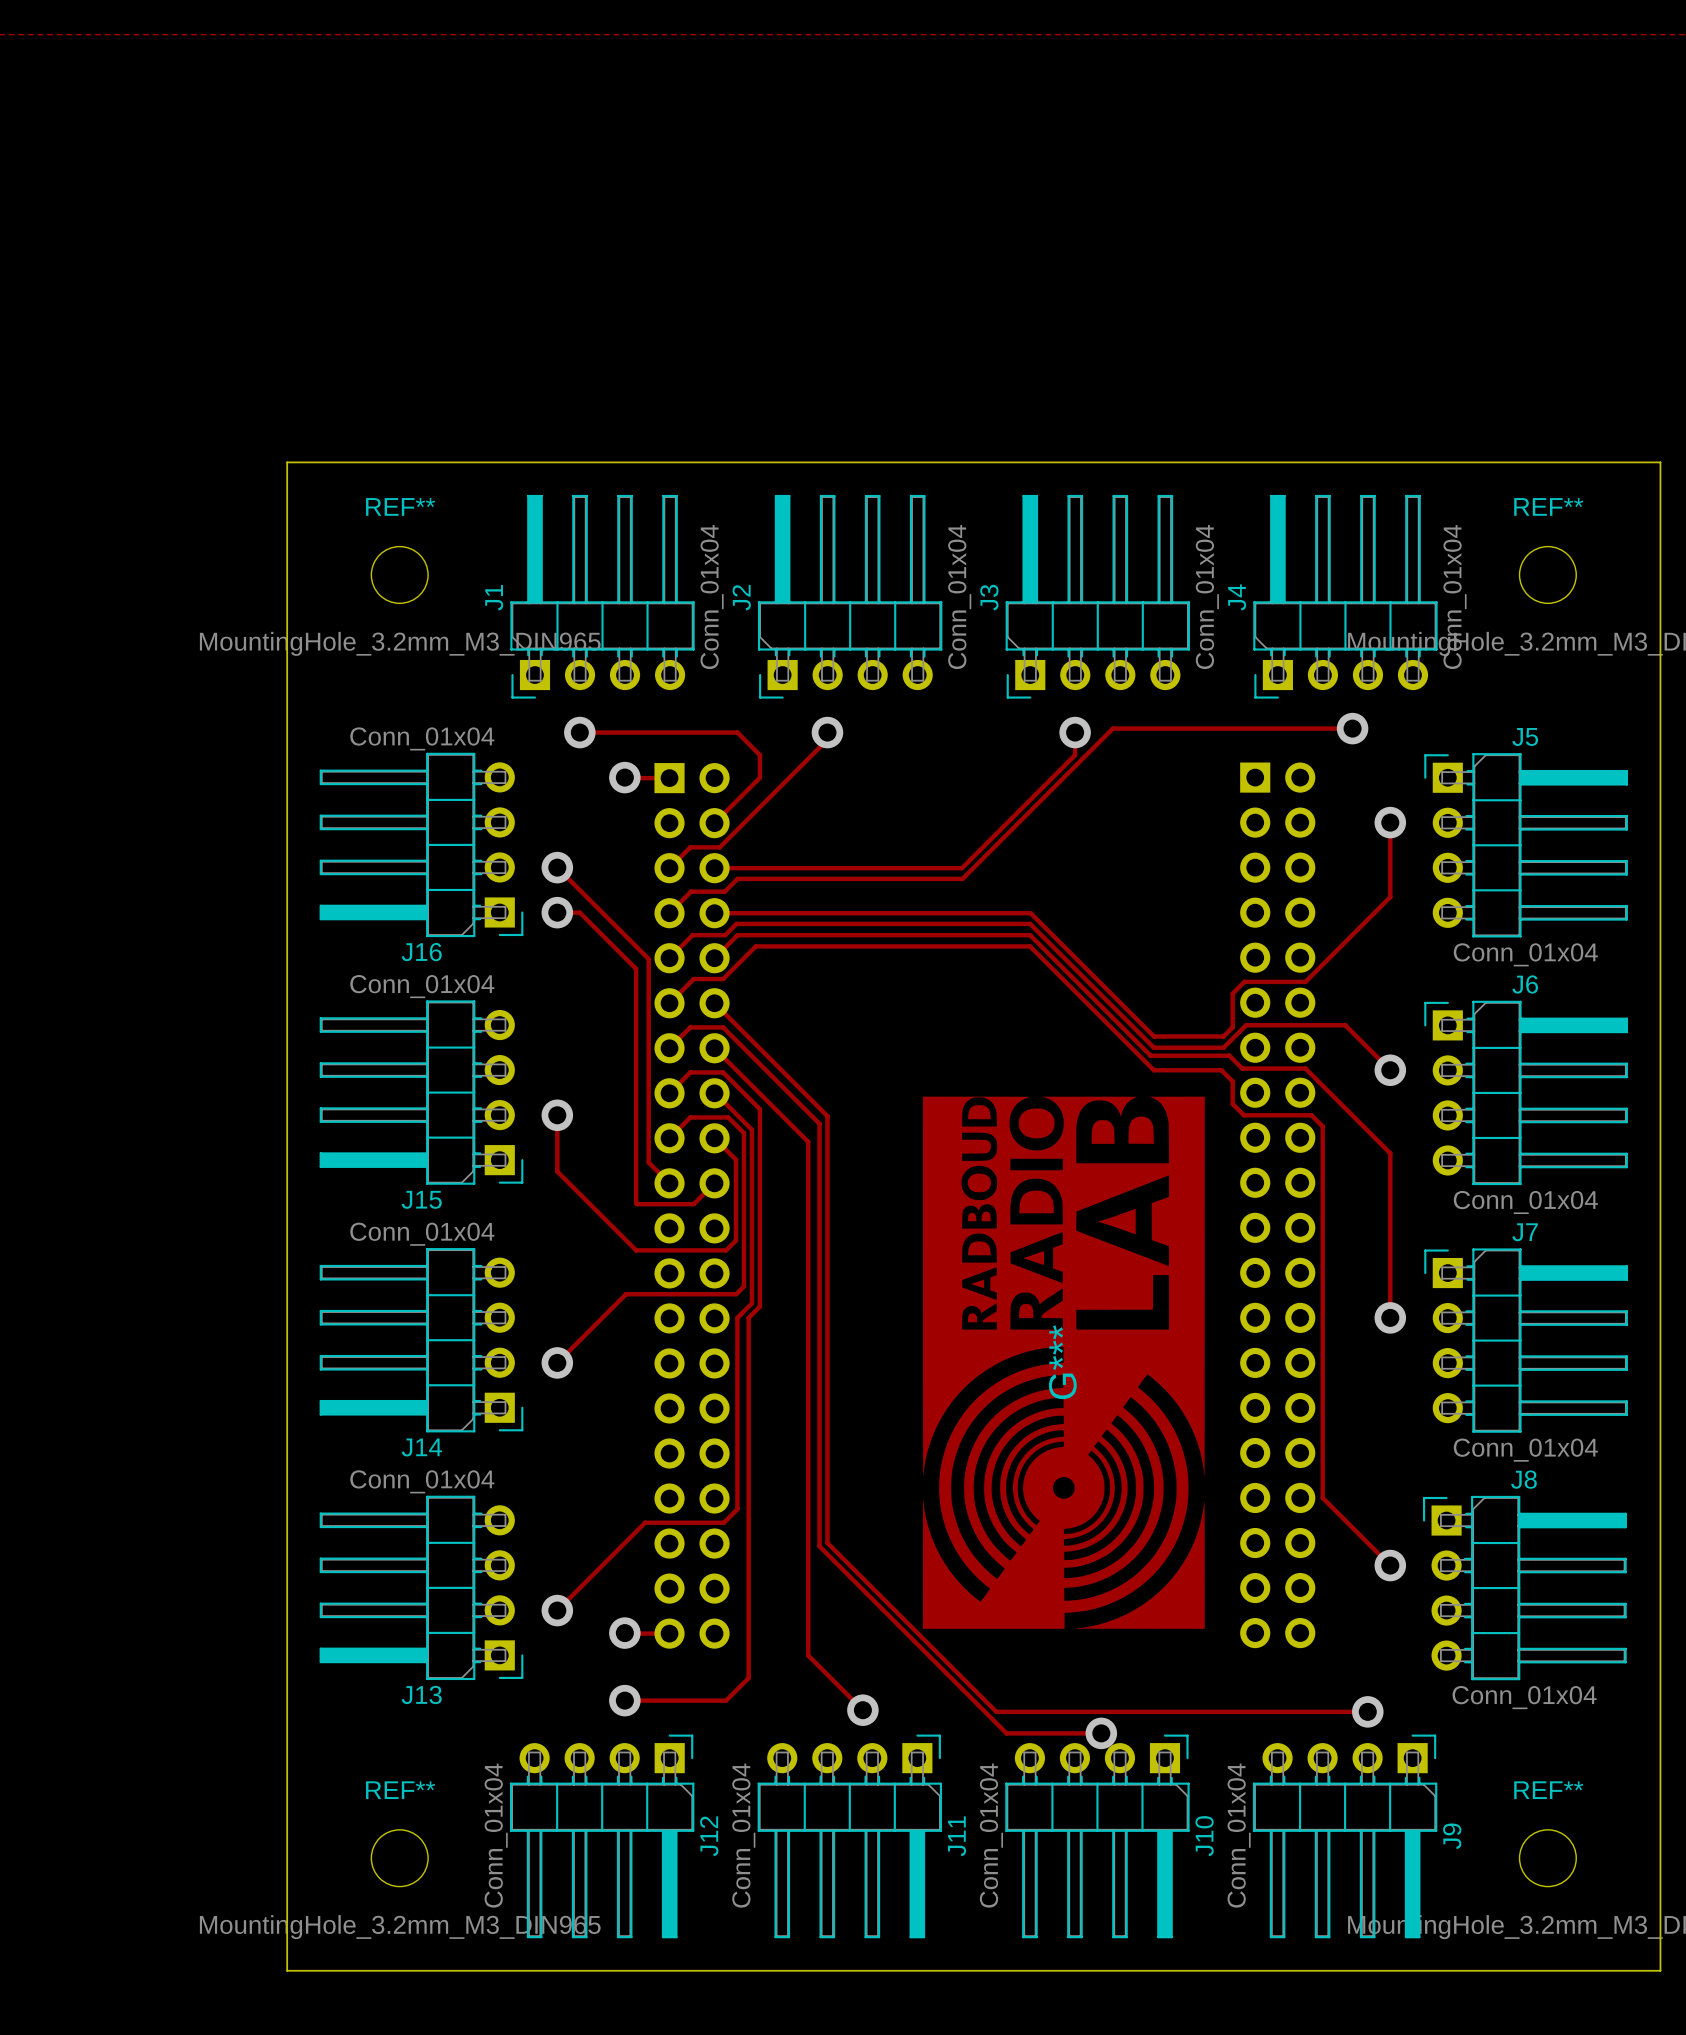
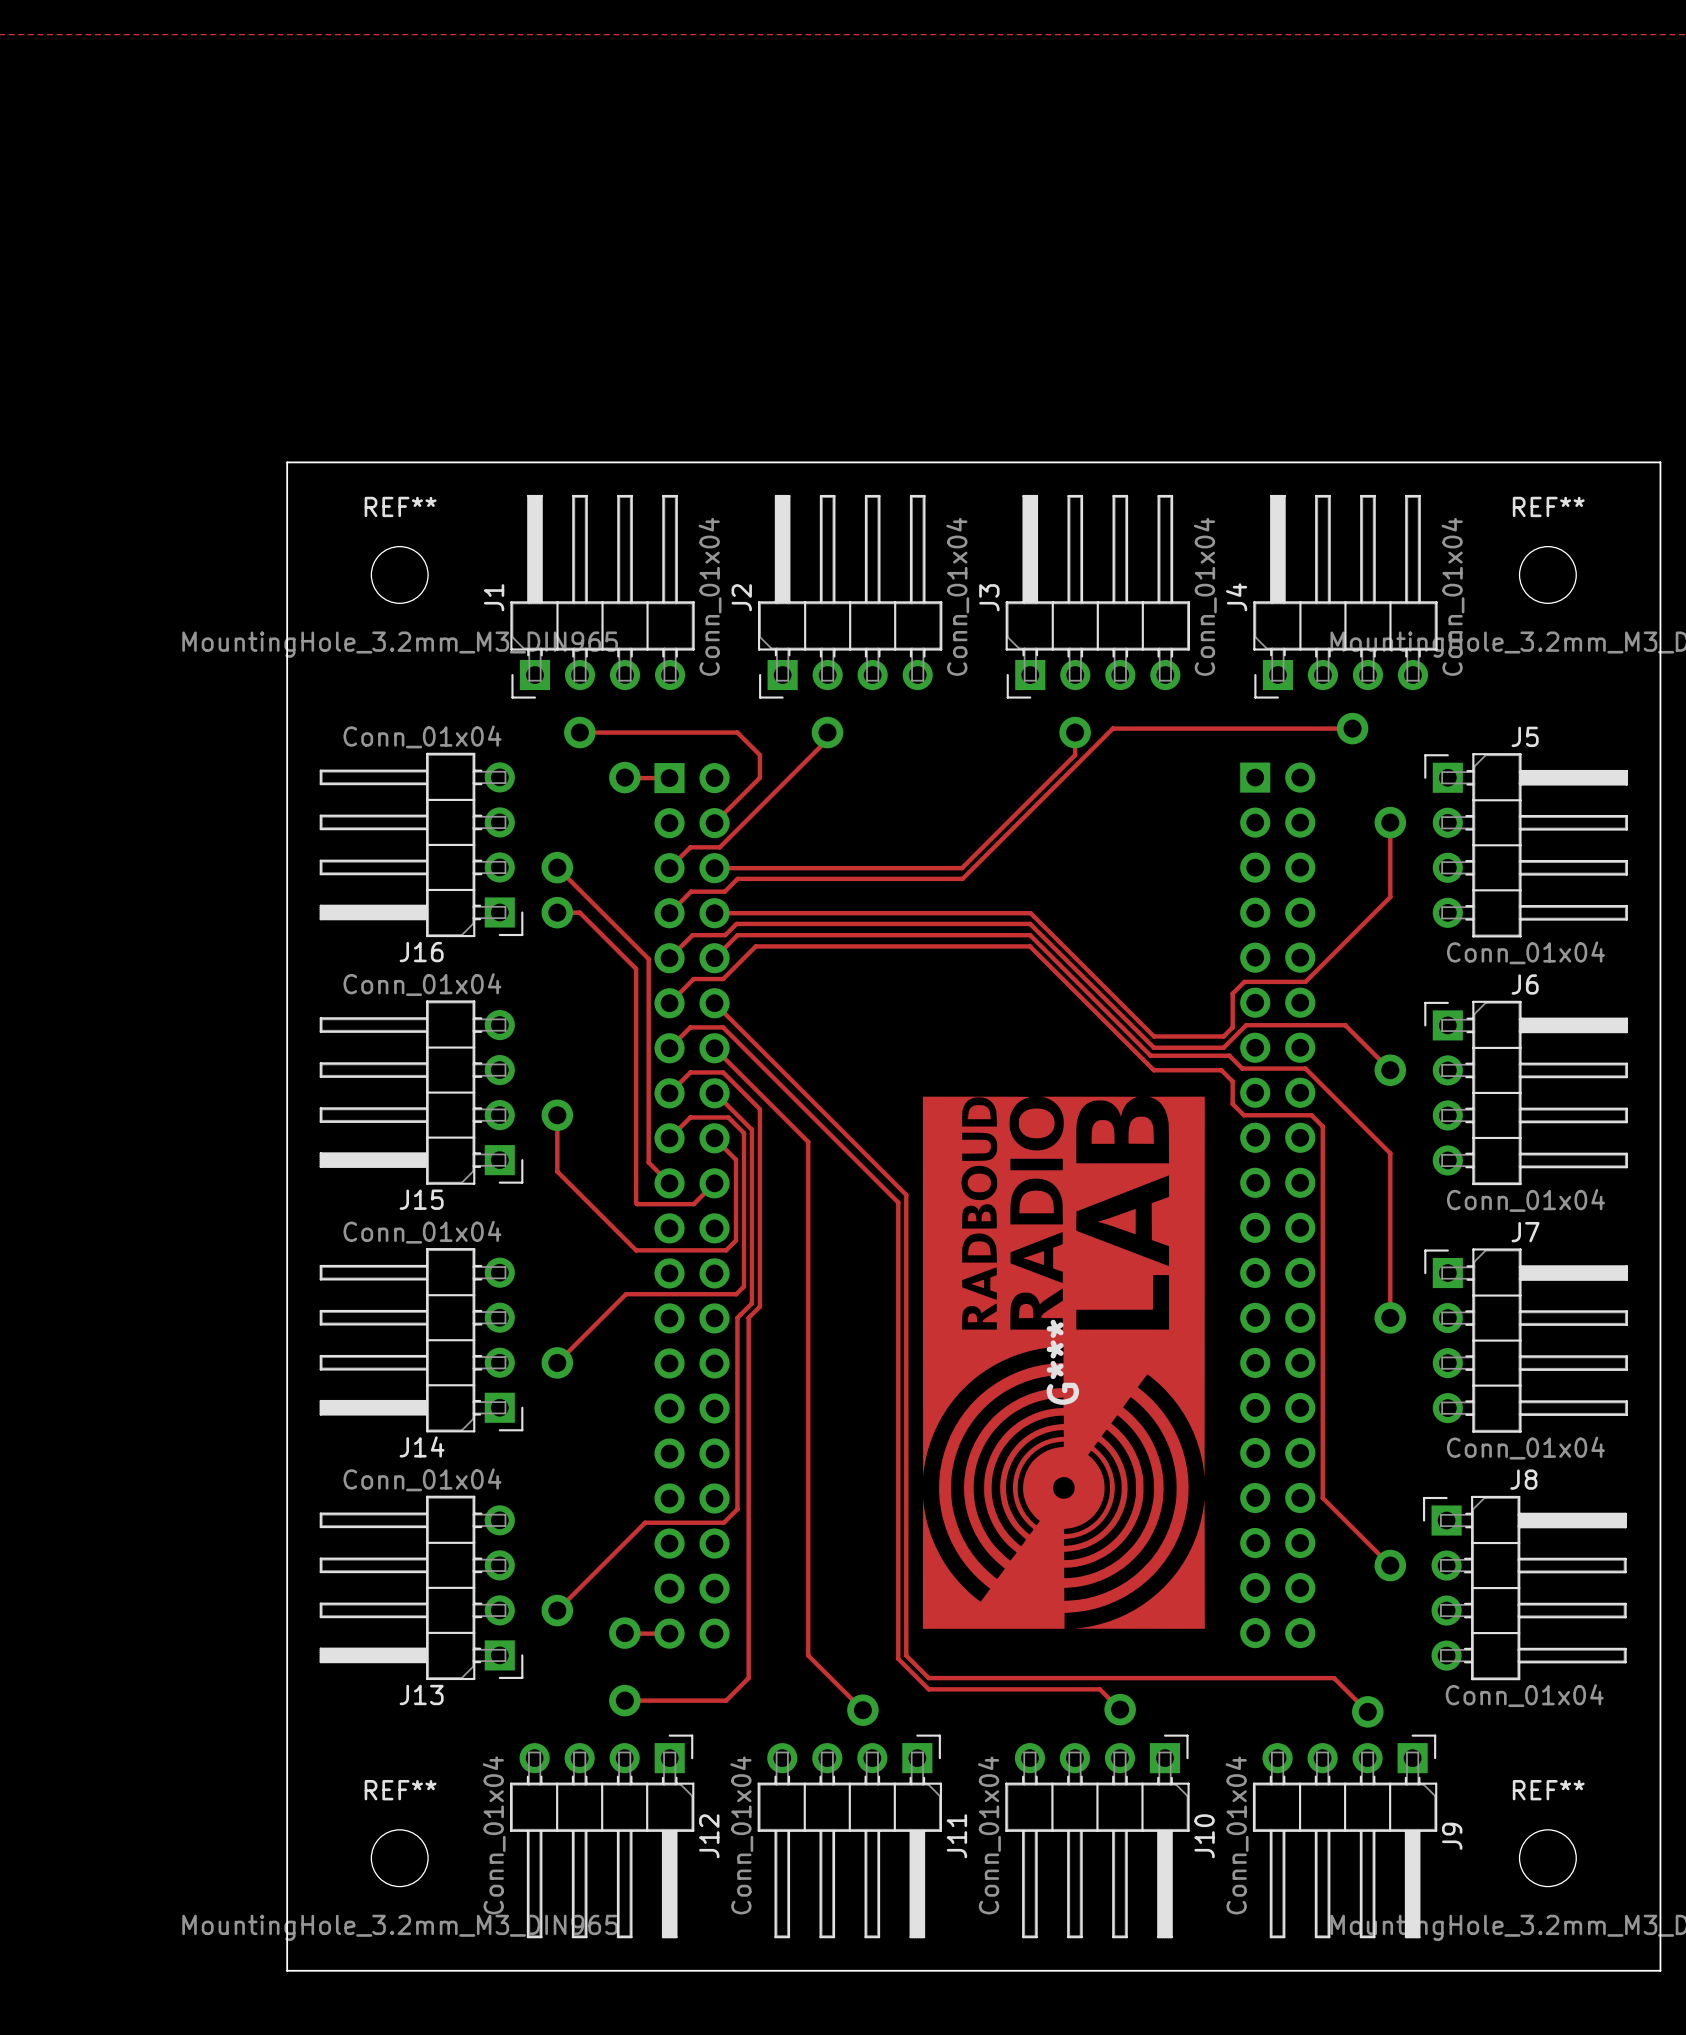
track: (827, 1116) (827, 1543) (996, 1711) (1367, 1711) -> (827, 1116) (906, 1194) (906, 1655) (928, 1678) (1334, 1678) (1367, 1711)
track: (819, 1123) (819, 1546) (1006, 1733) (1101, 1733) -> (819, 1123) (898, 1202) (898, 1658) (928, 1689) (1099, 1689) (1120, 1709)
via position: (1101, 1733) -> (1120, 1709)

